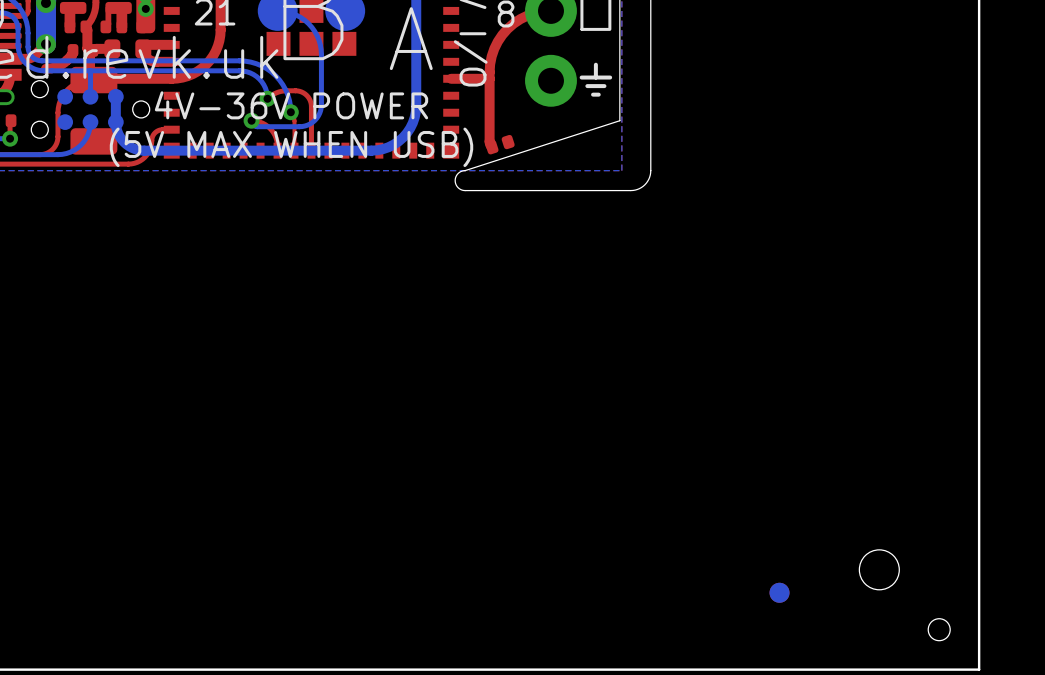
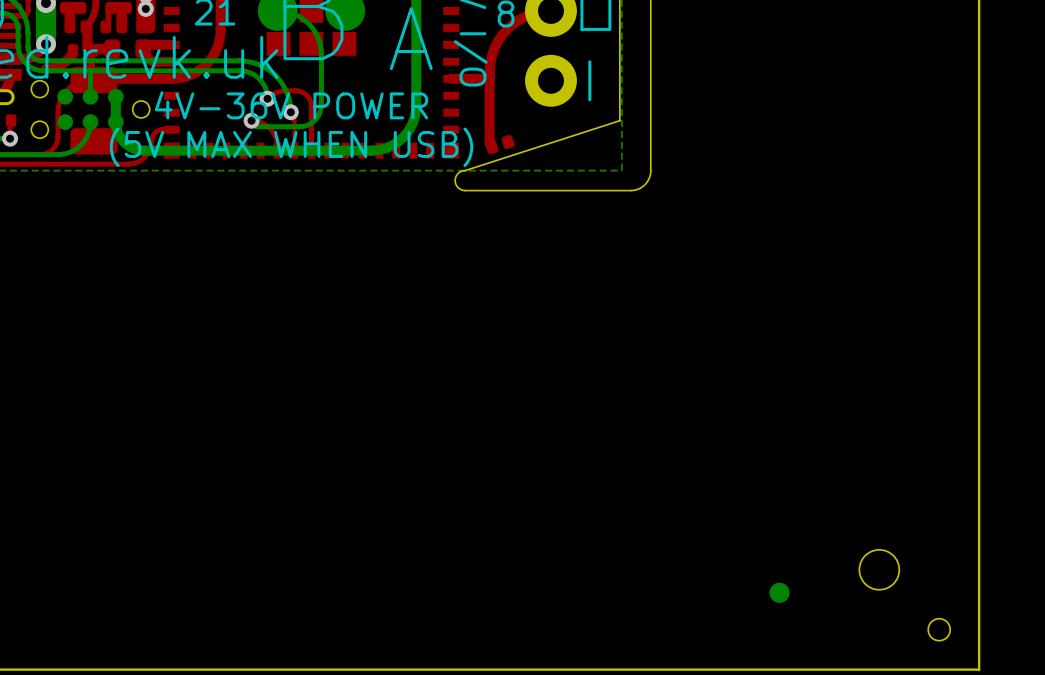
text: ⏚ (595, 79) -> - (589, 80)

